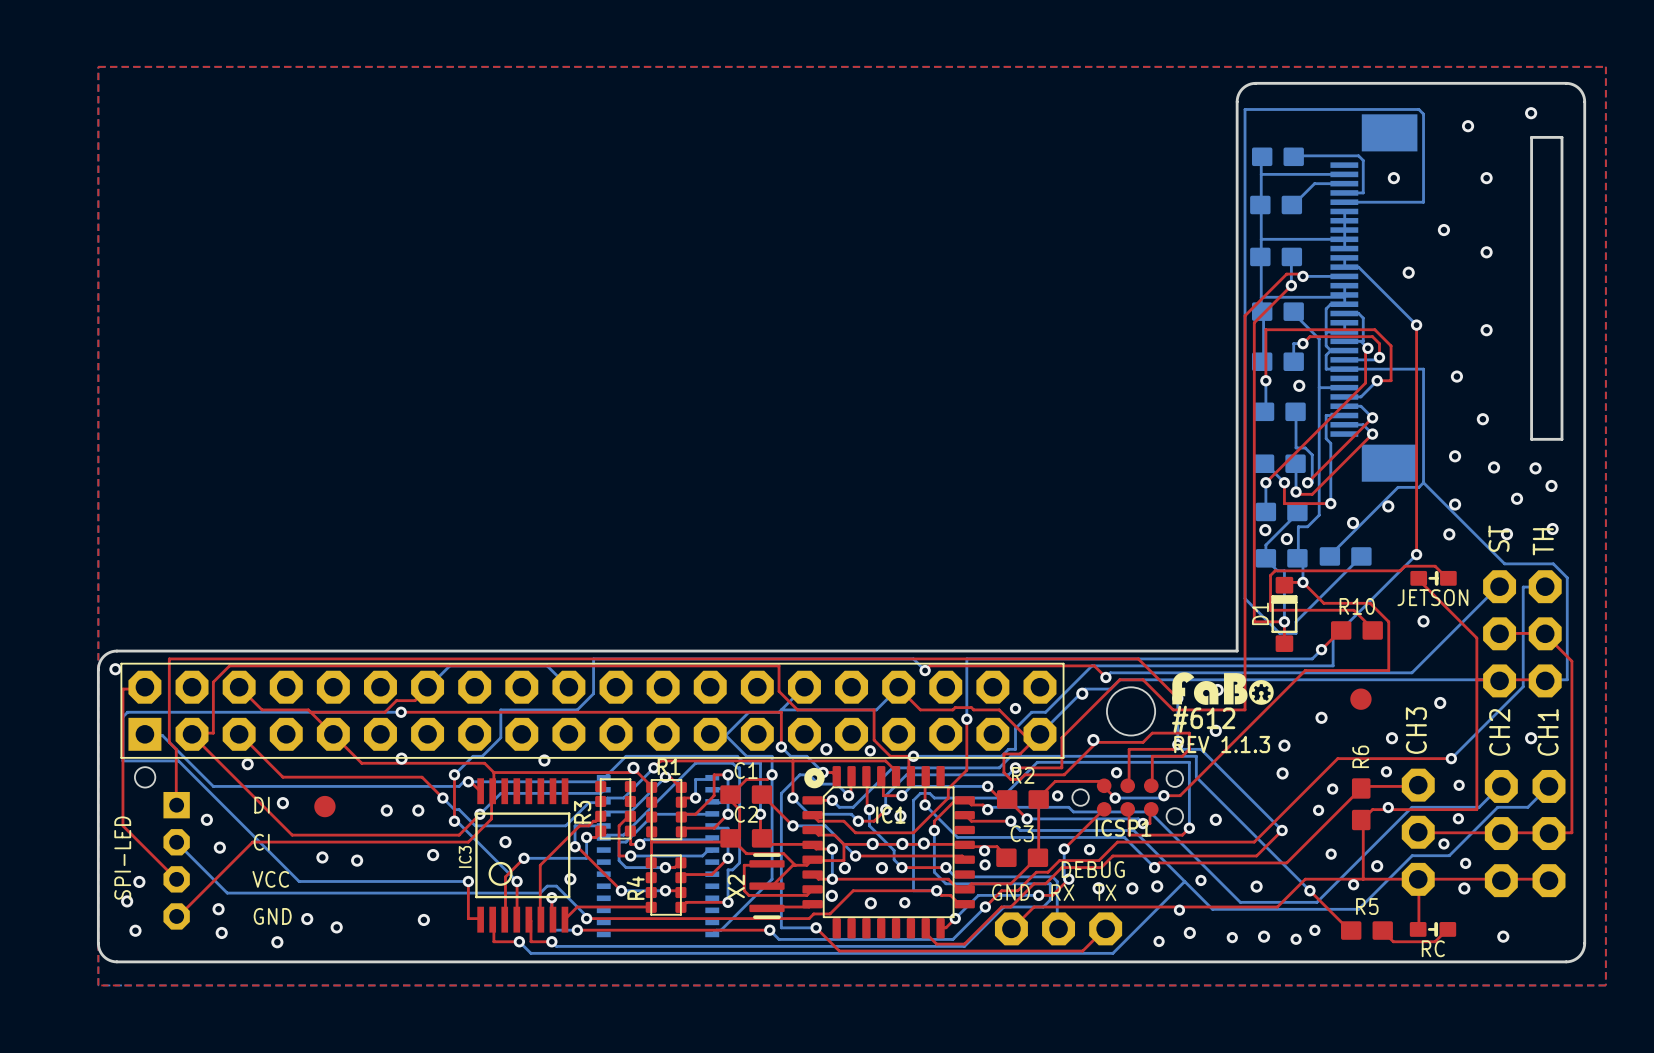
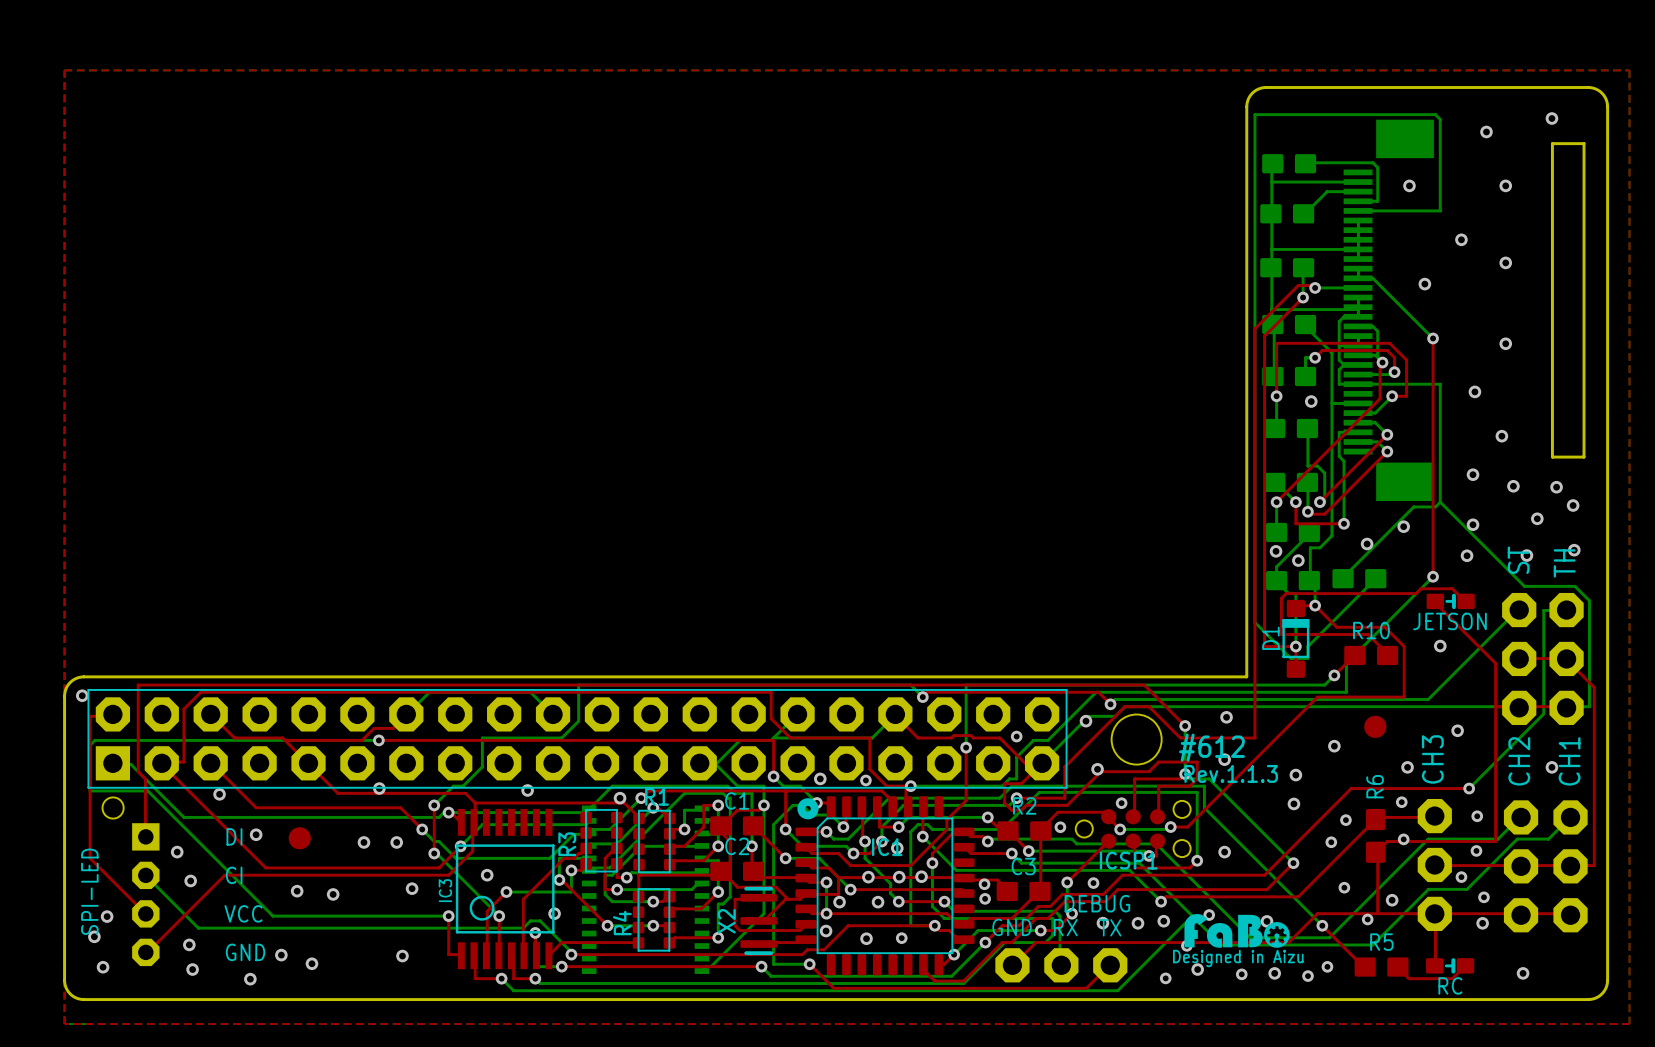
drawing position: (1222, 688) -> (1237, 930)
text: REV 1.1.3 (1222, 744) -> Rev.1.1.3 (1231, 773)
text: none -> Designed in Aizu (1238, 958)

